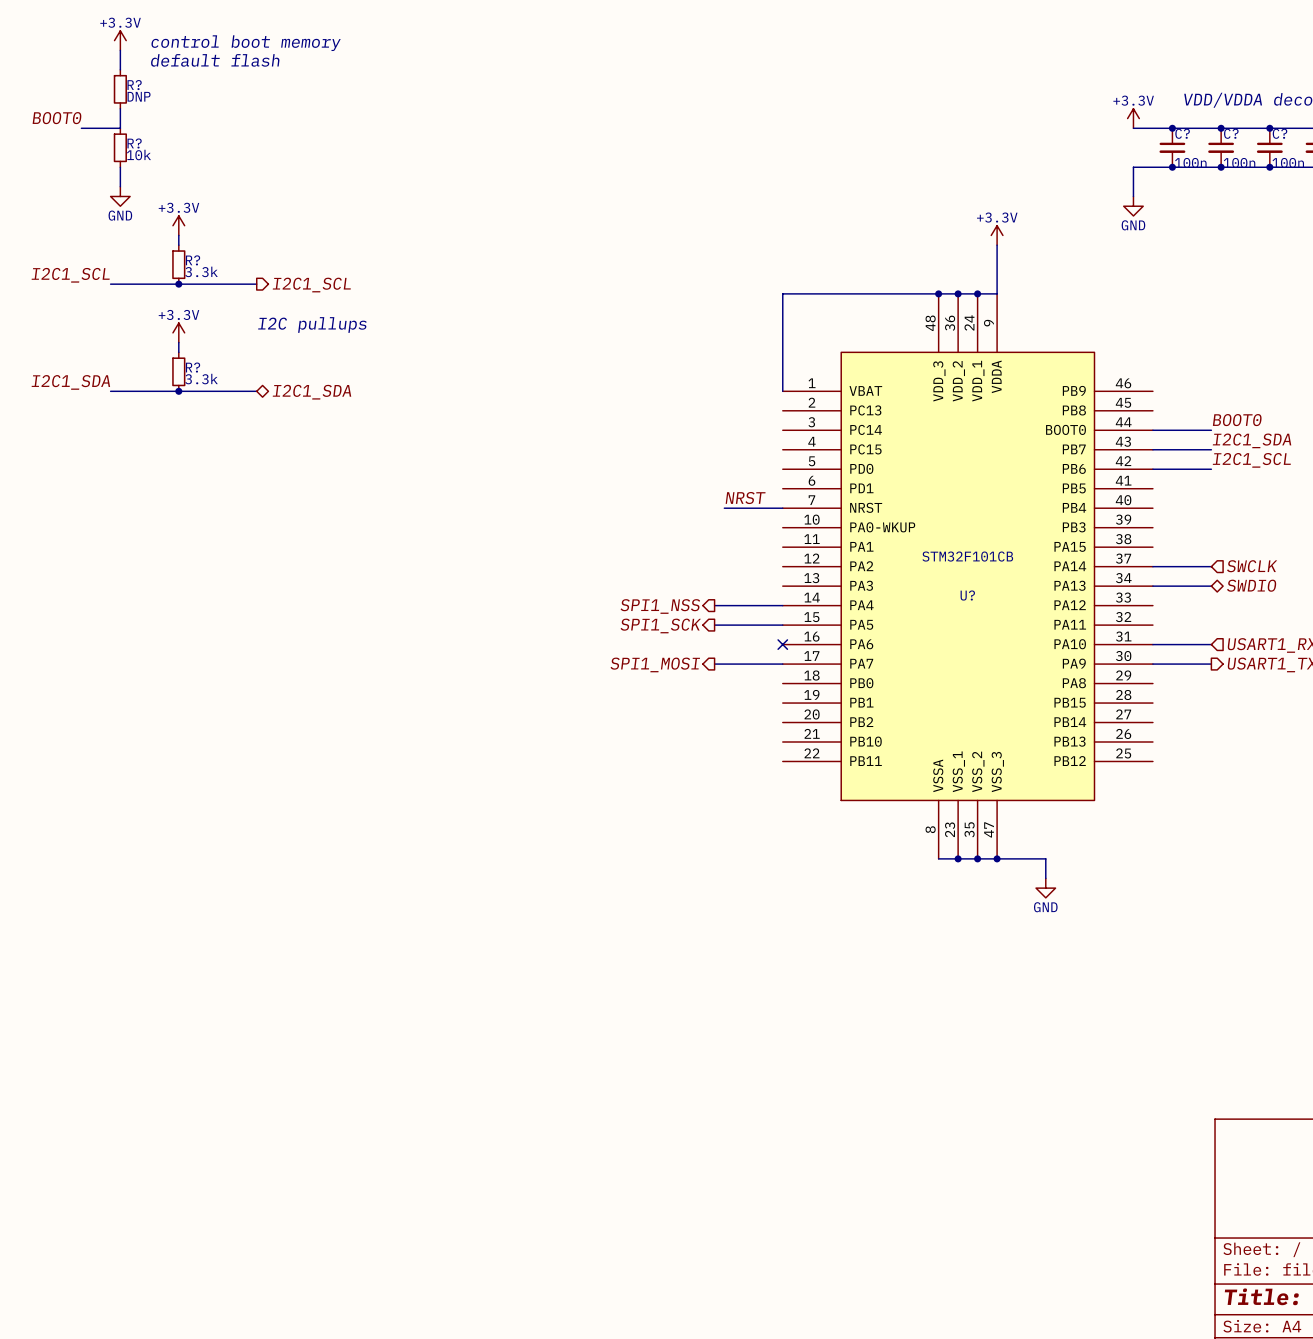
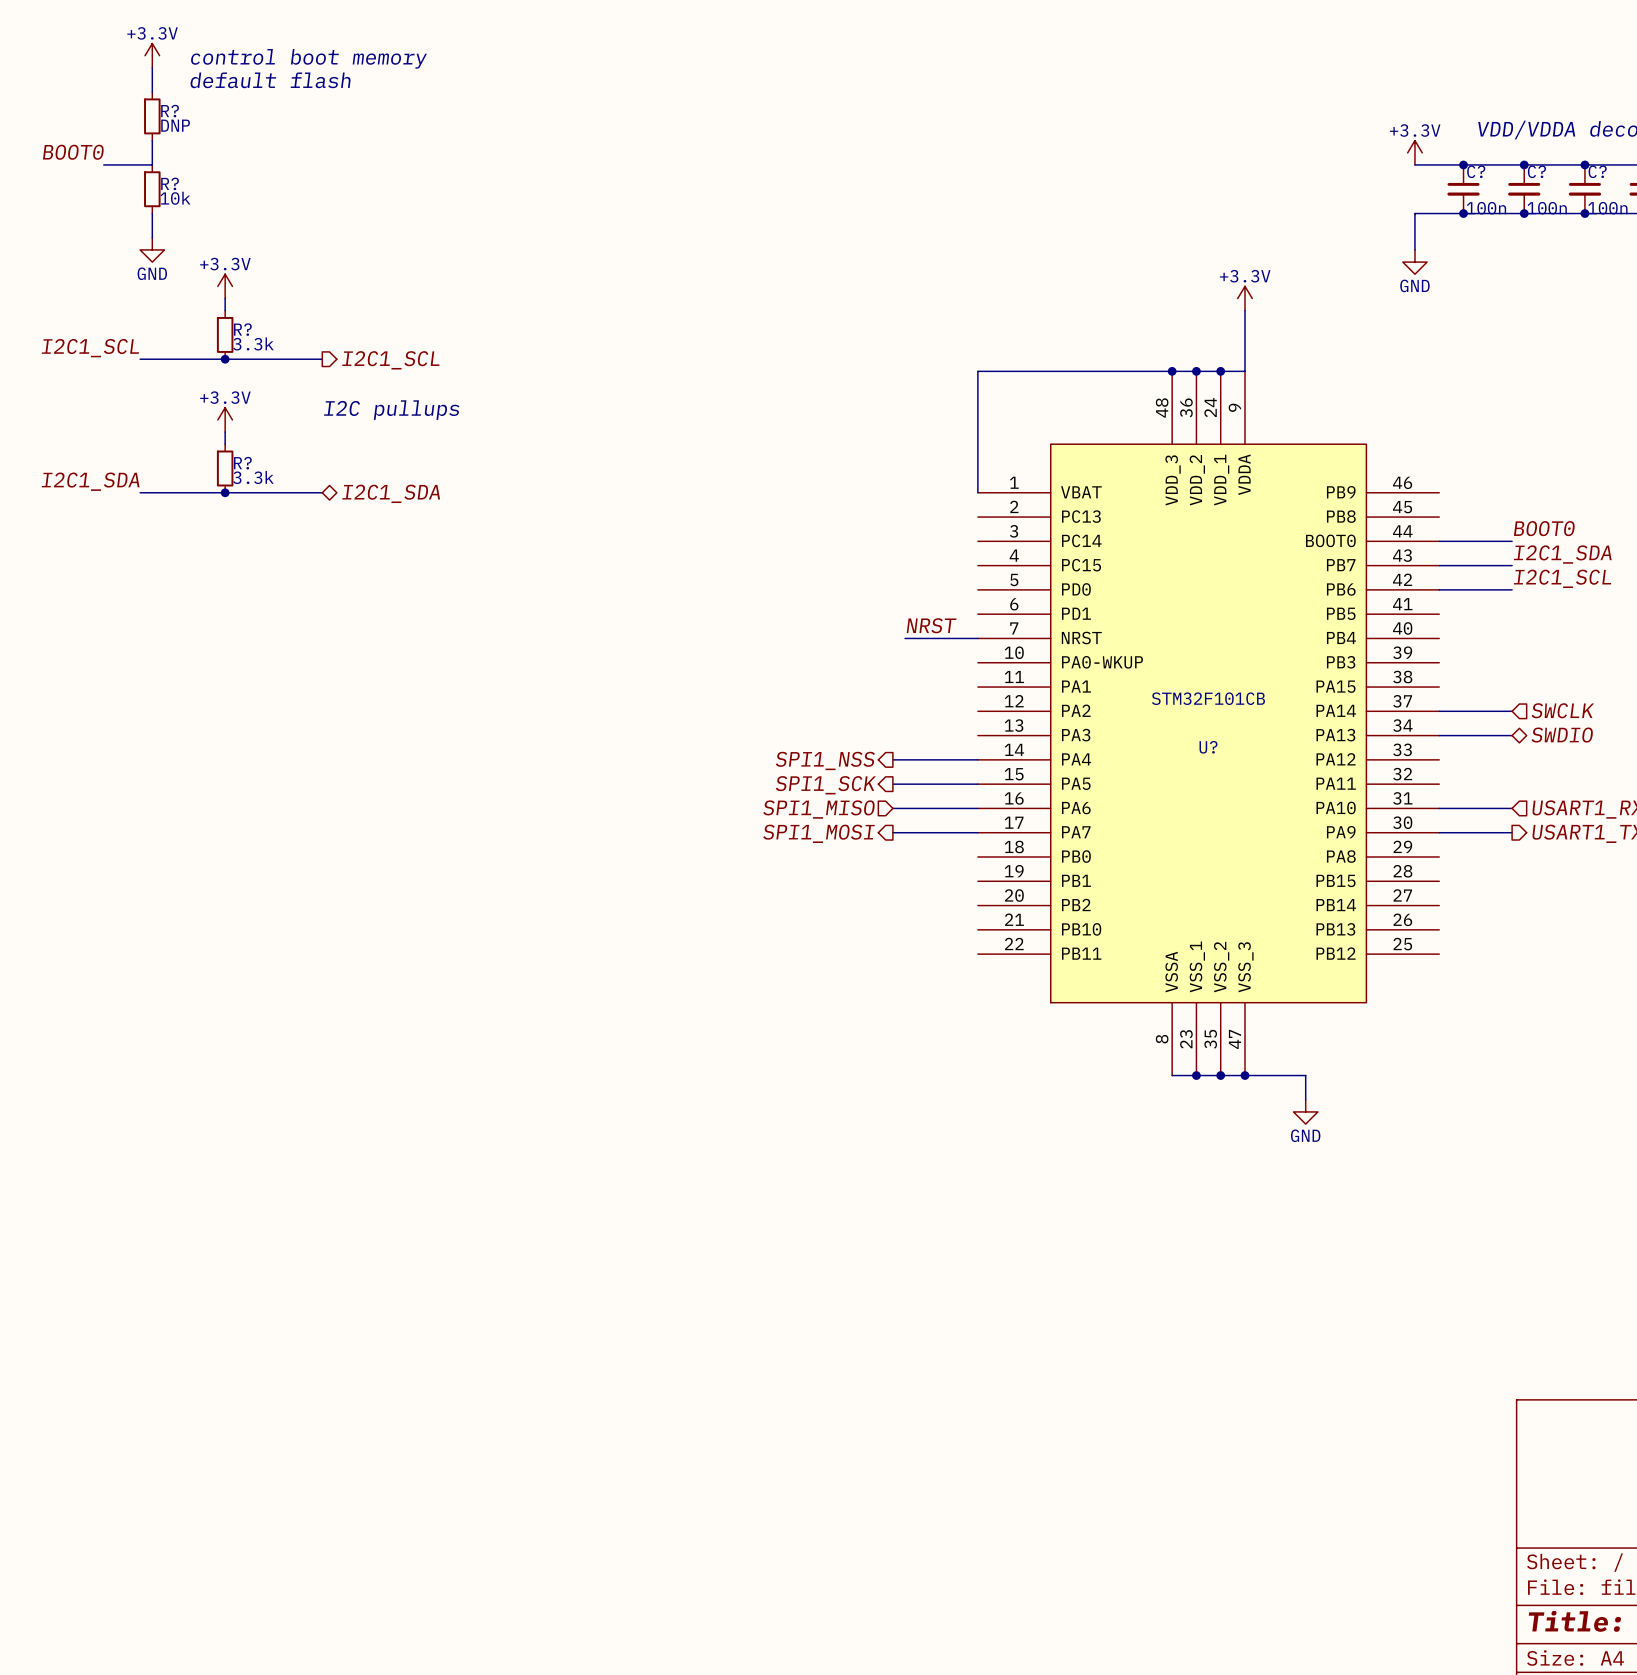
wire: none -> (892, 808) (977, 808)
no-connect mark: (782, 644) -> none
hierarchical label: none -> SPI1_MISO (818, 809)

